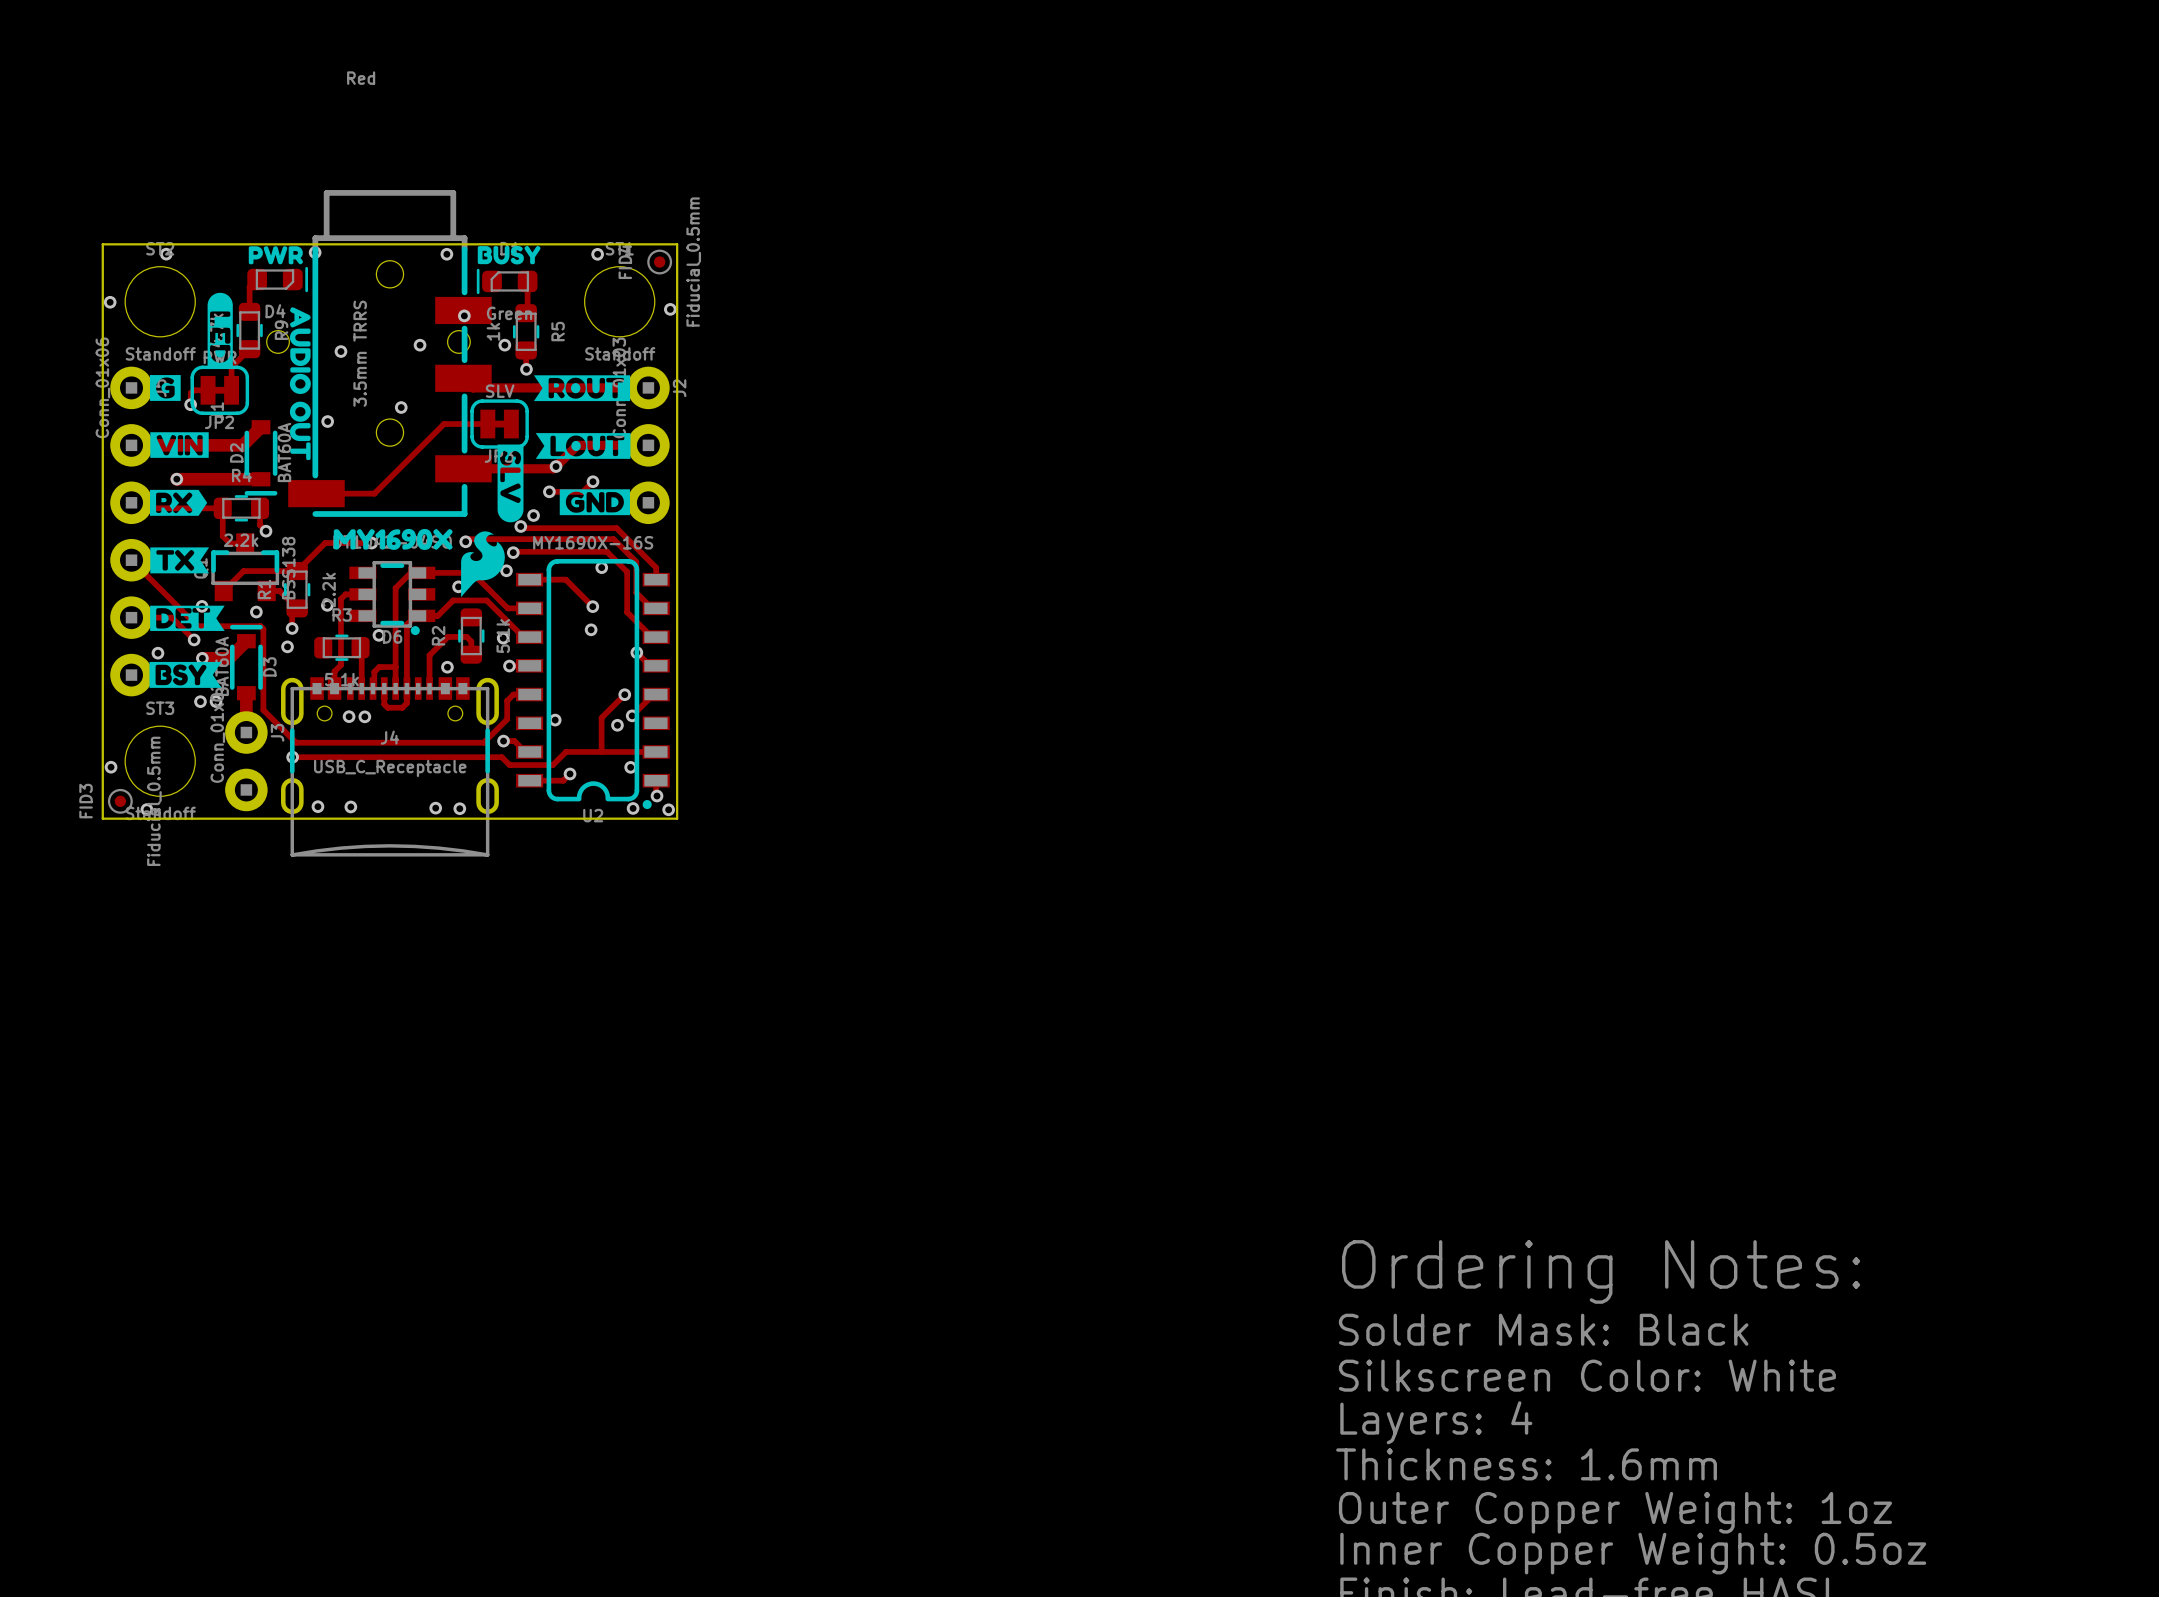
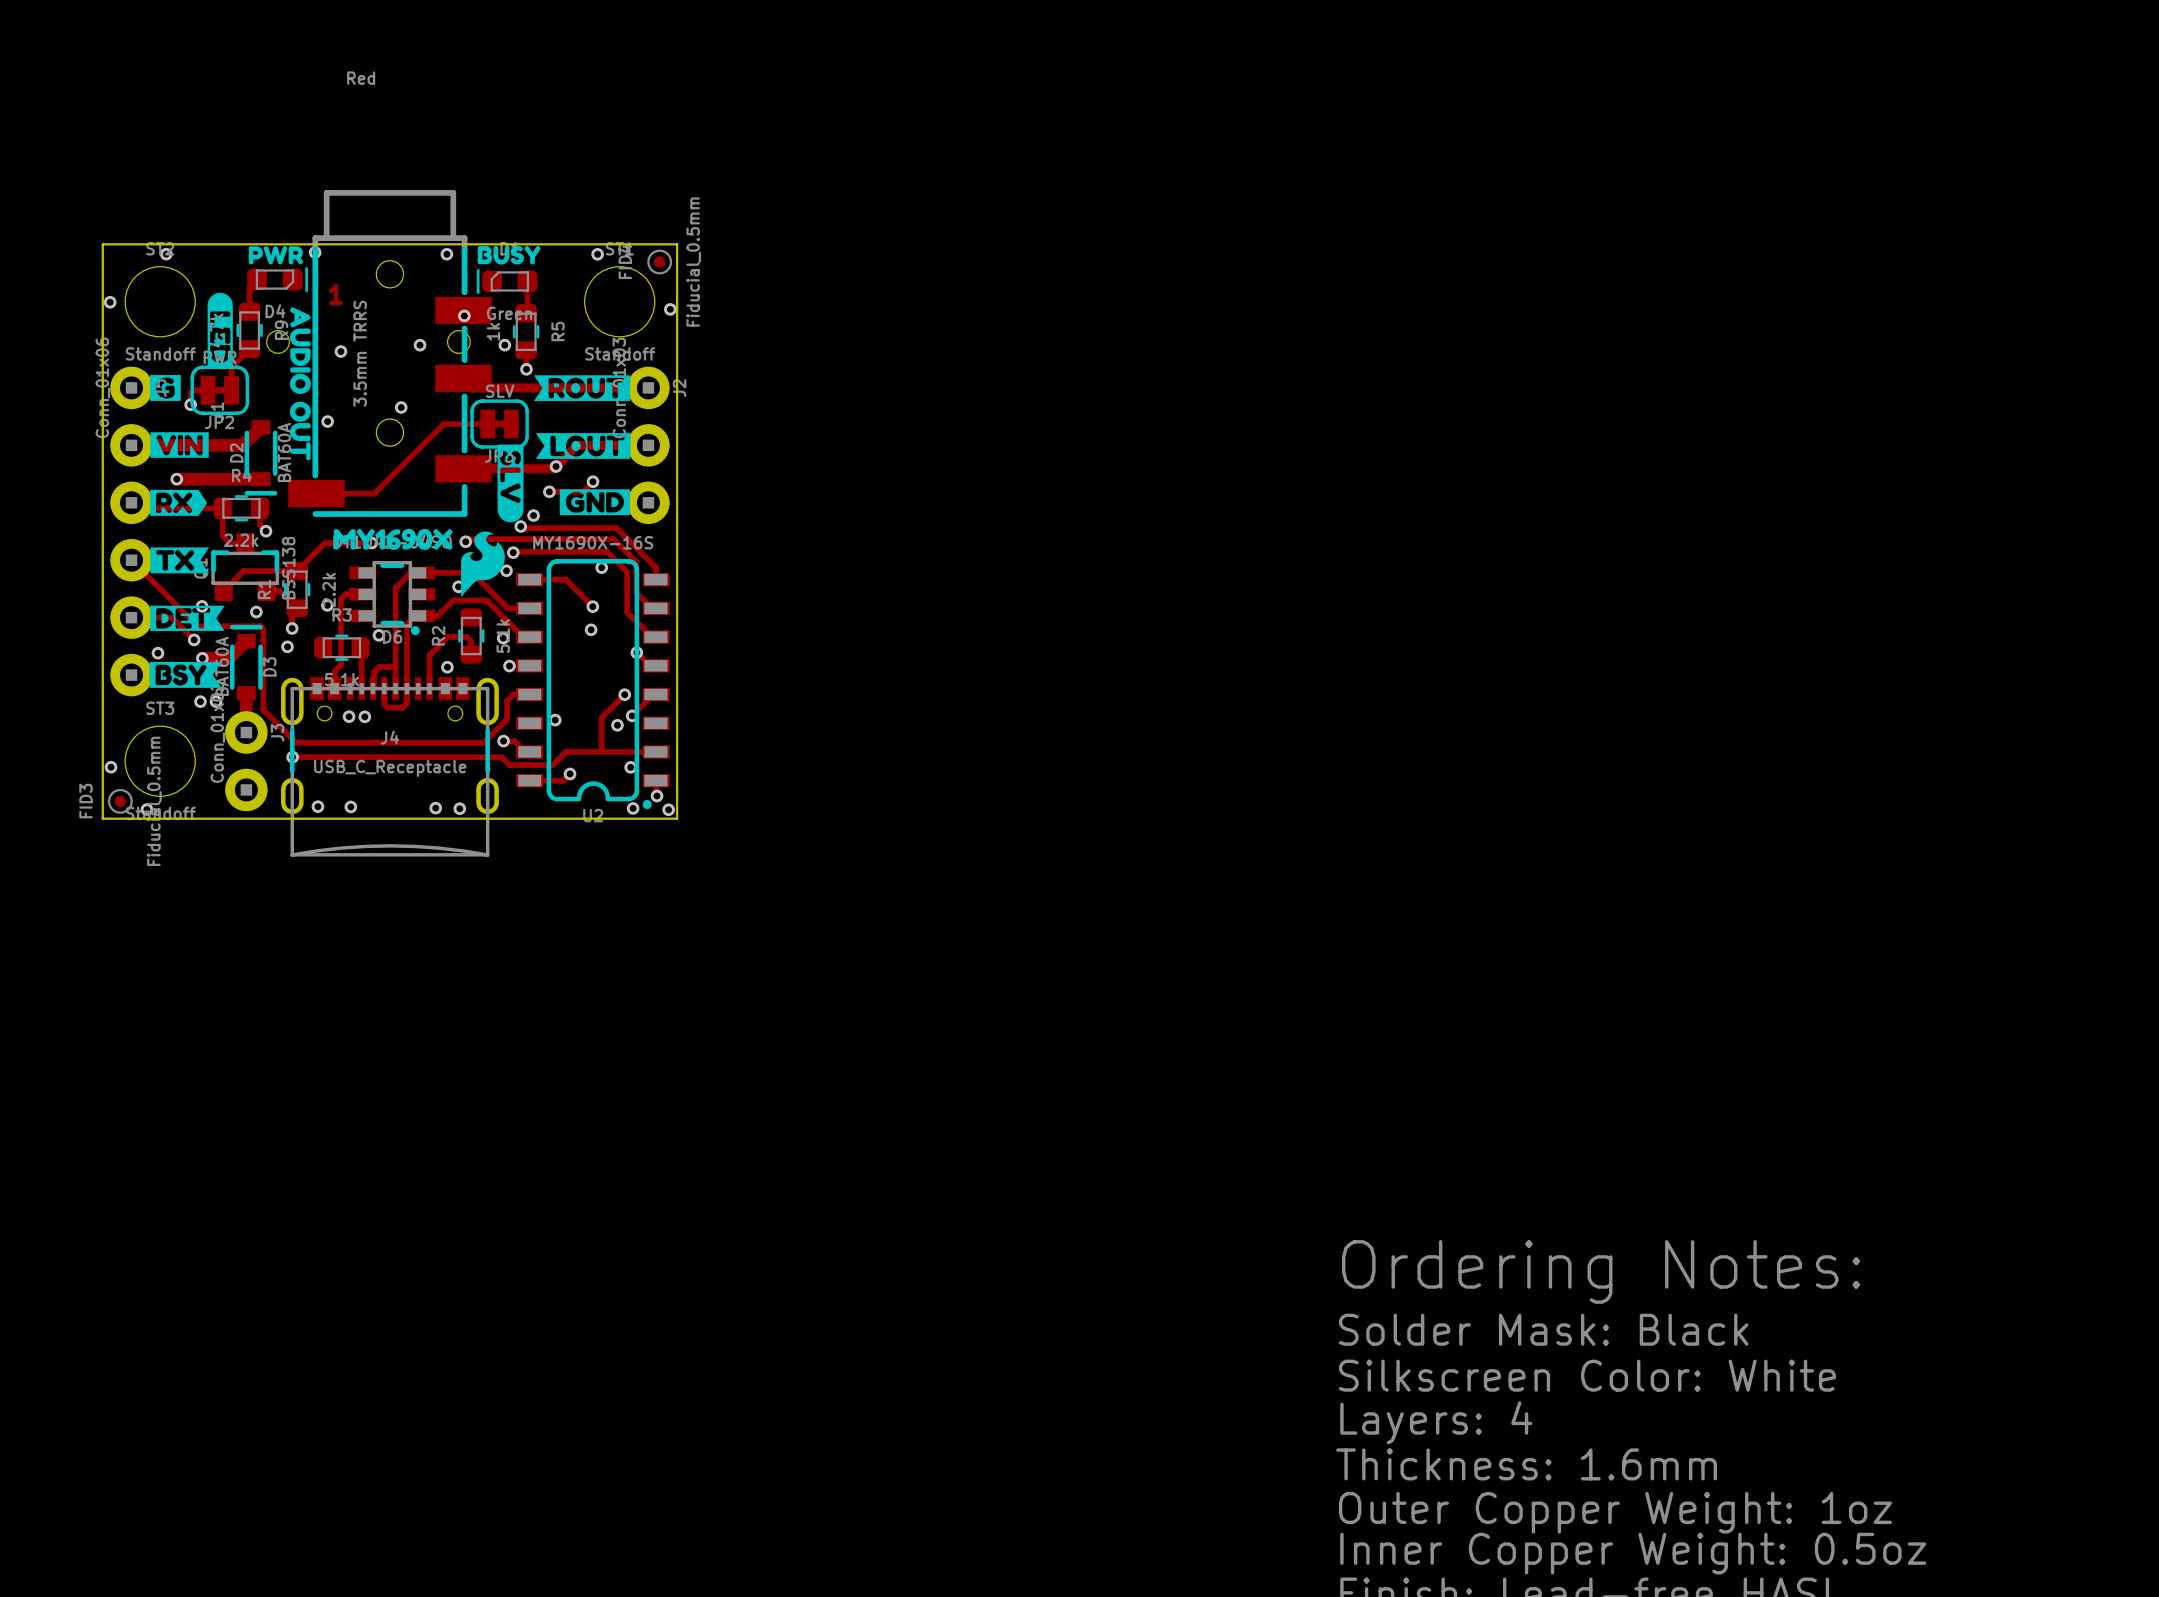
text: none -> 1 (335, 294)

